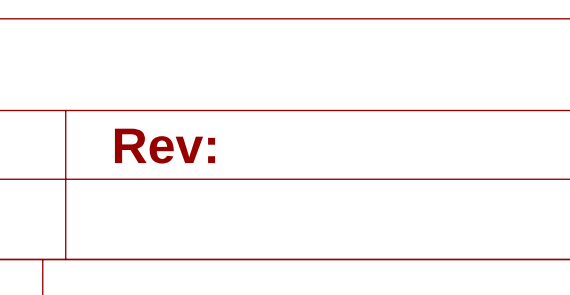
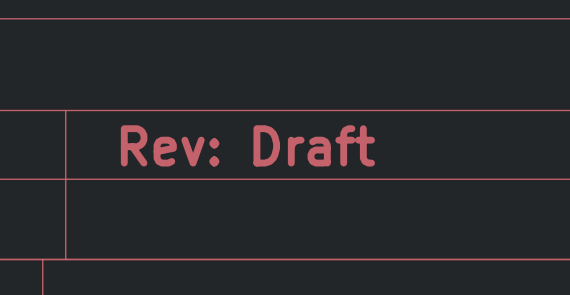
title block: Rev: (165, 146) -> Rev: Draft (247, 145)

